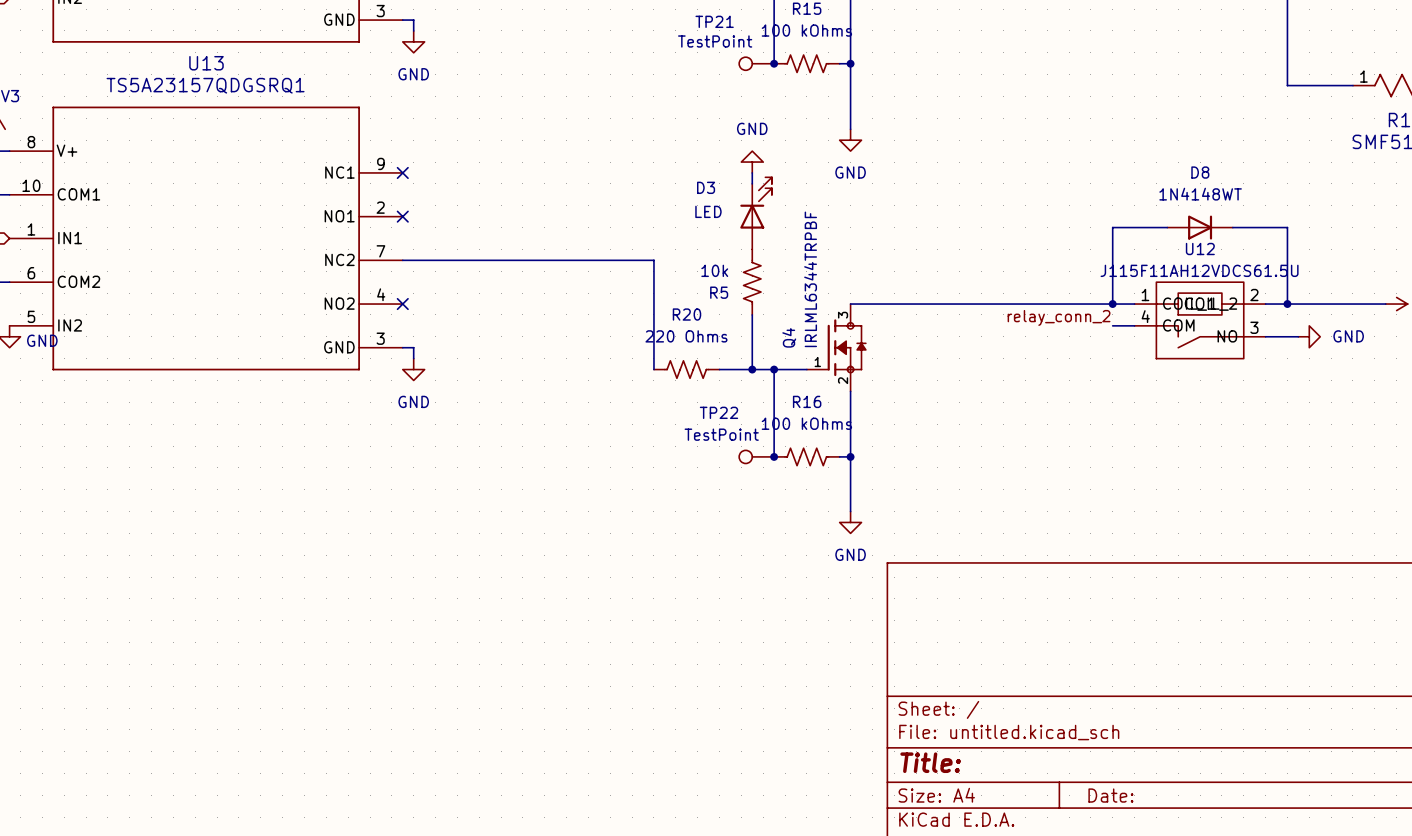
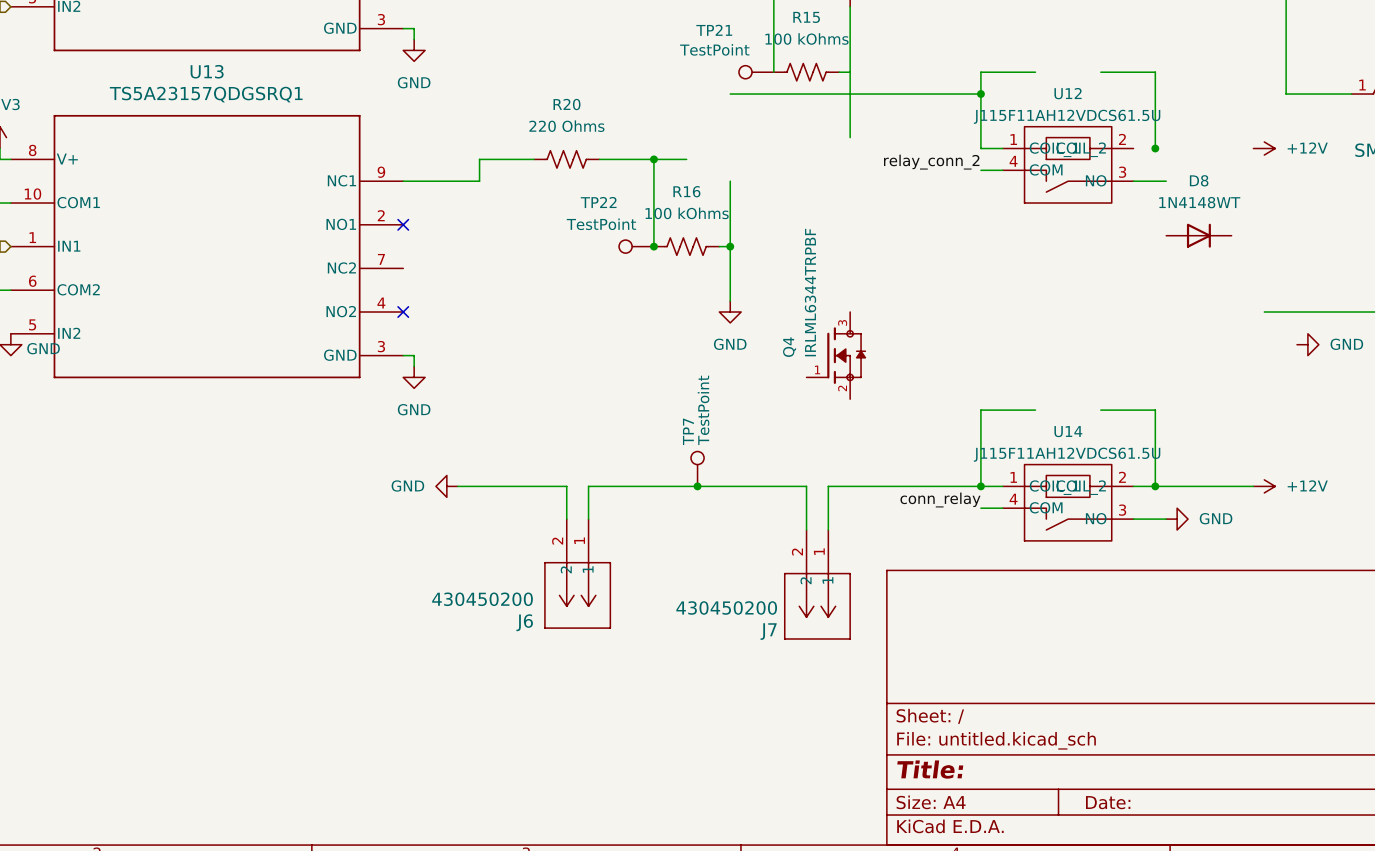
junction: (774, 63) -> none
junction: (850, 63) -> none
wire: none -> (1035, 72) (980, 72) (980, 148) (1002, 148)
wire: none -> (730, 94) (980, 94)
junction: none -> (980, 94)
power symbol: GND (850, 140) -> none
junction: none -> (1155, 148)
power symbol: none -> +12V (1264, 148)
wire: none -> (534, 159) (479, 159) (479, 181) (403, 181)
wire: none -> (599, 159) (686, 159)
wire: none -> (653, 159) (653, 246)
junction: none -> (653, 159)
power symbol: GND (752, 162) -> none
no-connect mark: (402, 172) -> none
wire: none -> (730, 181) (730, 301)
wire: (752, 172) (752, 183) -> none
D3: LED (756, 213) -> none
wire: (1167, 227) (1112, 227) (1112, 304) -> none
wire: (1232, 227) (1287, 227) (1287, 304) -> (1100, 72) (1155, 72) (1155, 148)
junction: none -> (653, 246)
wire: none -> (719, 246) (730, 246)
junction: none -> (730, 246)
wire: (402, 260) (653, 260) (653, 369) -> none
R5: 10k (752, 282) -> none
power symbol: none -> GND (730, 312)
wire: (850, 304) (1134, 304) -> none
junction: (1112, 304) -> none
junction: (1287, 304) -> none
wire: (752, 314) (752, 369) -> none
label position: relay_conn_2 (1059, 317) -> relay_conn_2 (931, 162)
U12 position: (1200, 320) -> (1068, 164)
wire: (1112, 325) (1134, 325) -> (980, 170) (1002, 170)
wire: (1265, 336) (1298, 336) -> (1133, 181) (1166, 181)
R20 position: (686, 369) -> (566, 159)
wire: (719, 369) (806, 369) -> none
junction: (752, 369) -> none
wire: (774, 369) (774, 456) -> none
junction: (774, 369) -> none
wire: (850, 391) (850, 511) -> none
wire: none -> (1035, 410) (980, 410) (980, 486)
wire: none -> (1100, 410) (1155, 410) (1155, 486)
TP22 position: (756, 456) -> (636, 246)
junction: (774, 456) -> none
R16 position: (806, 456) -> (686, 246)
wire: (839, 456) (850, 456) -> none
junction: (850, 456) -> none
TP7: none -> TestPoint (697, 468)
power symbol: none -> GND (446, 486)
wire: none -> (457, 486) (566, 486) (566, 519)
junction: none -> (697, 486)
junction: none -> (980, 486)
wire: none -> (1002, 486) (828, 486) (828, 529)
wire: none -> (1133, 486) (1253, 486)
junction: none -> (1155, 486)
power symbol: none -> +12V (1264, 486)
label: none -> conn_relay (940, 500)
U14: none -> J115F11AH12VDCS61.5U (1068, 502)
wire: none -> (980, 508) (1002, 508)
wire: none -> (588, 519) (588, 486) (806, 486) (806, 529)
wire: none -> (1133, 519) (1166, 519)
power symbol: none -> GND (1177, 519)
power symbol: GND (850, 522) -> none
J6: none -> 430450200 (577, 573)
J7: none -> 430450200 (817, 584)

